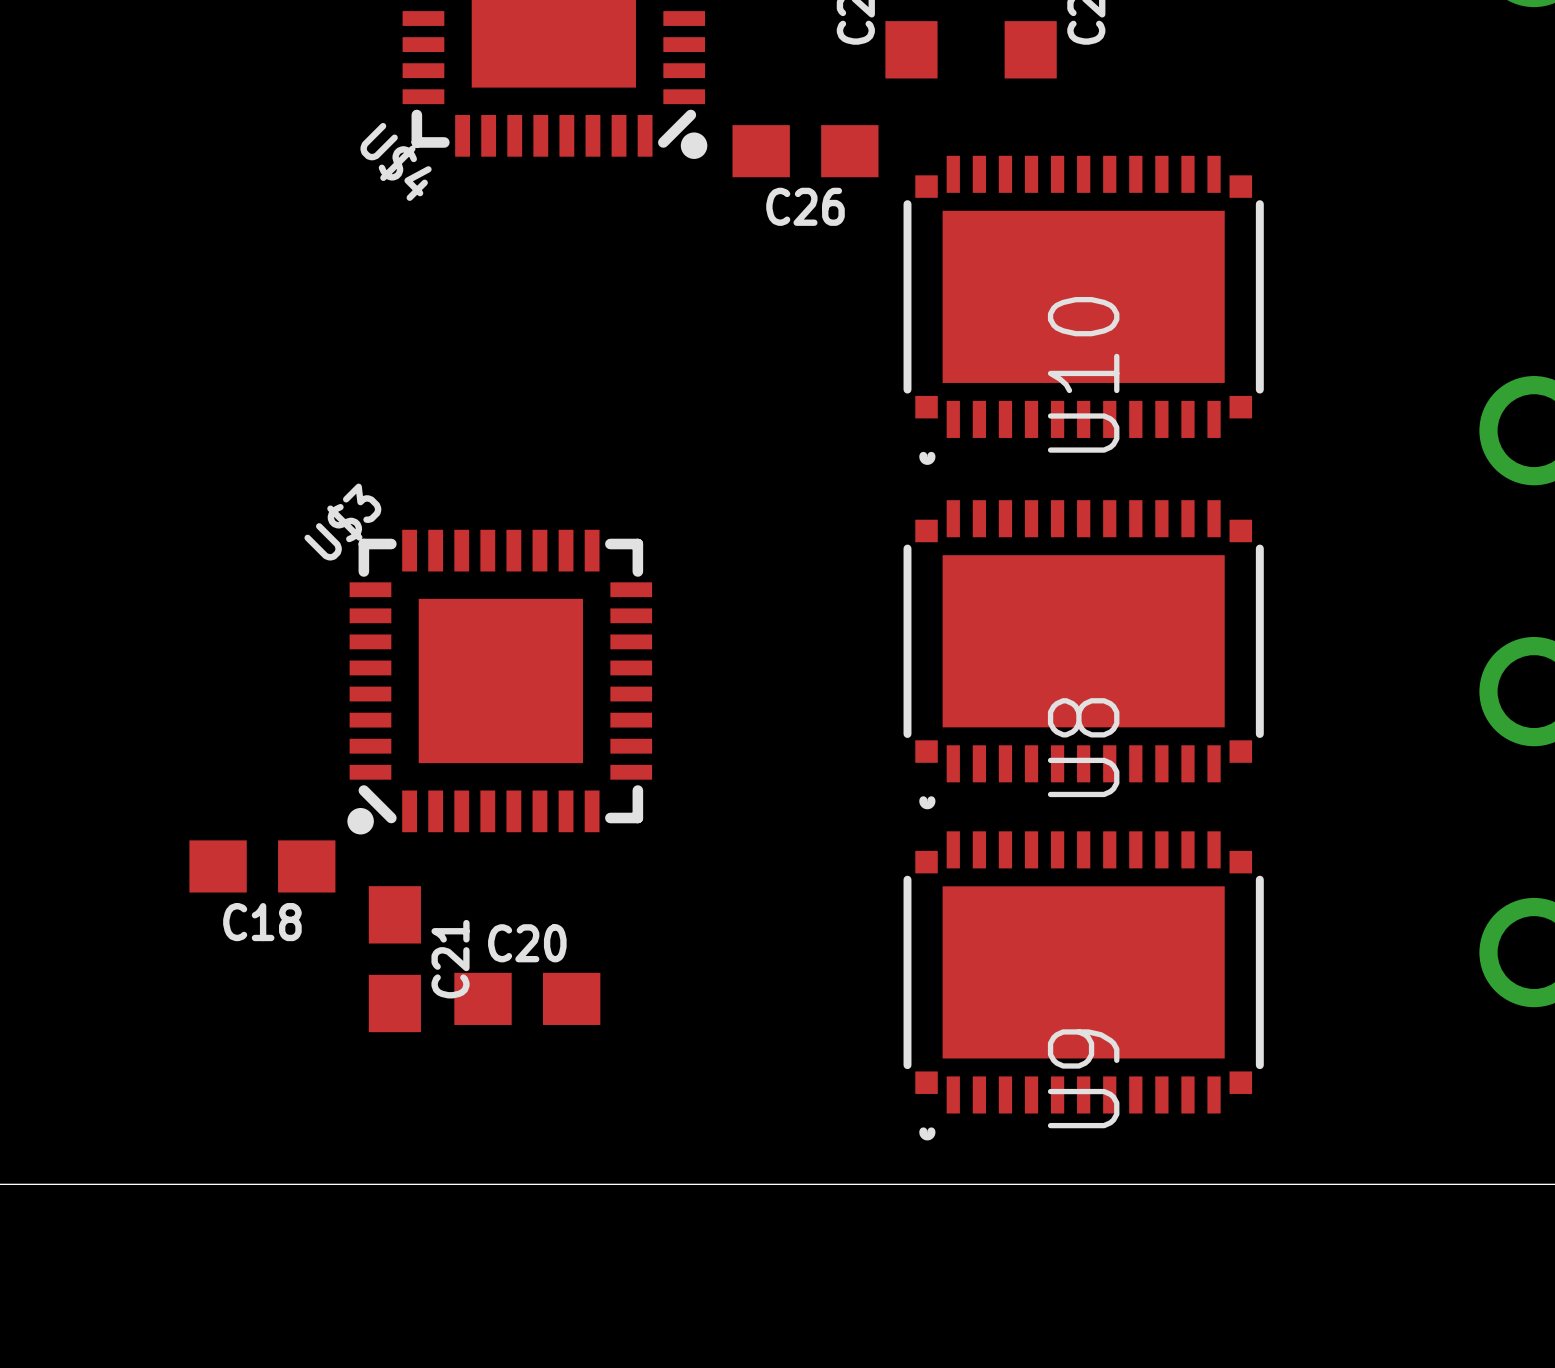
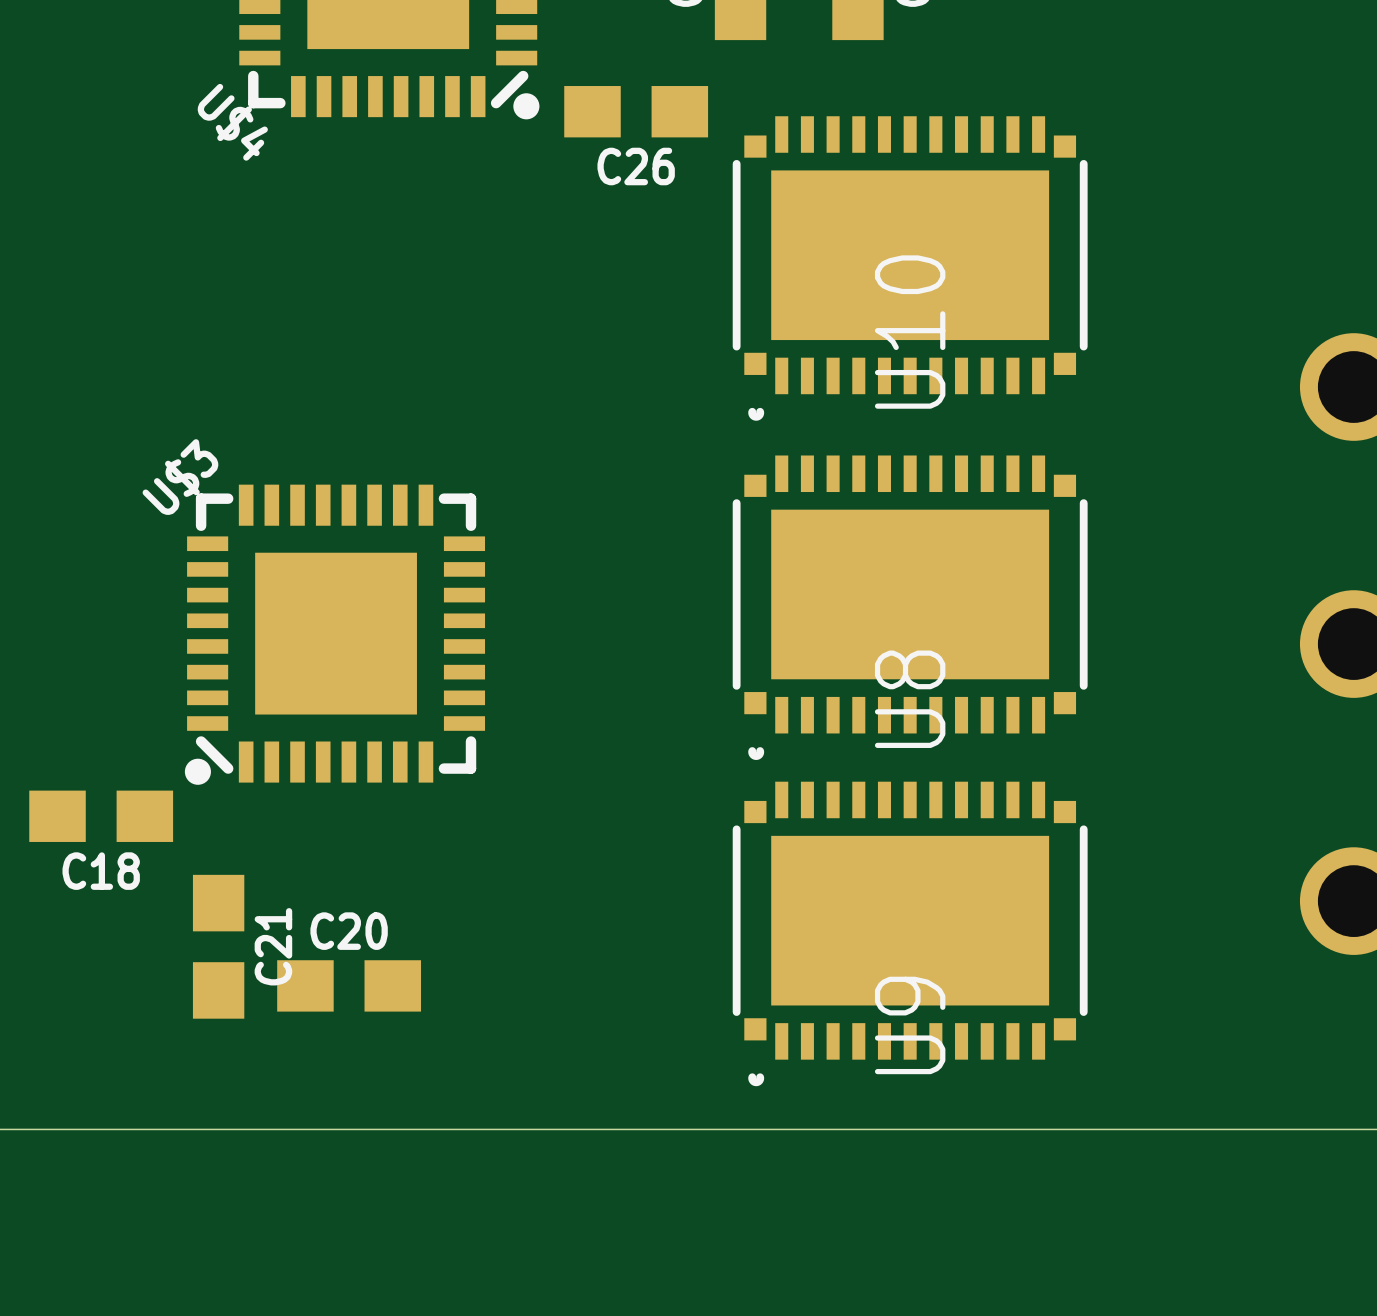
C21 position: (394, 959) -> (218, 946)
C20 position: (527, 998) -> (349, 985)

